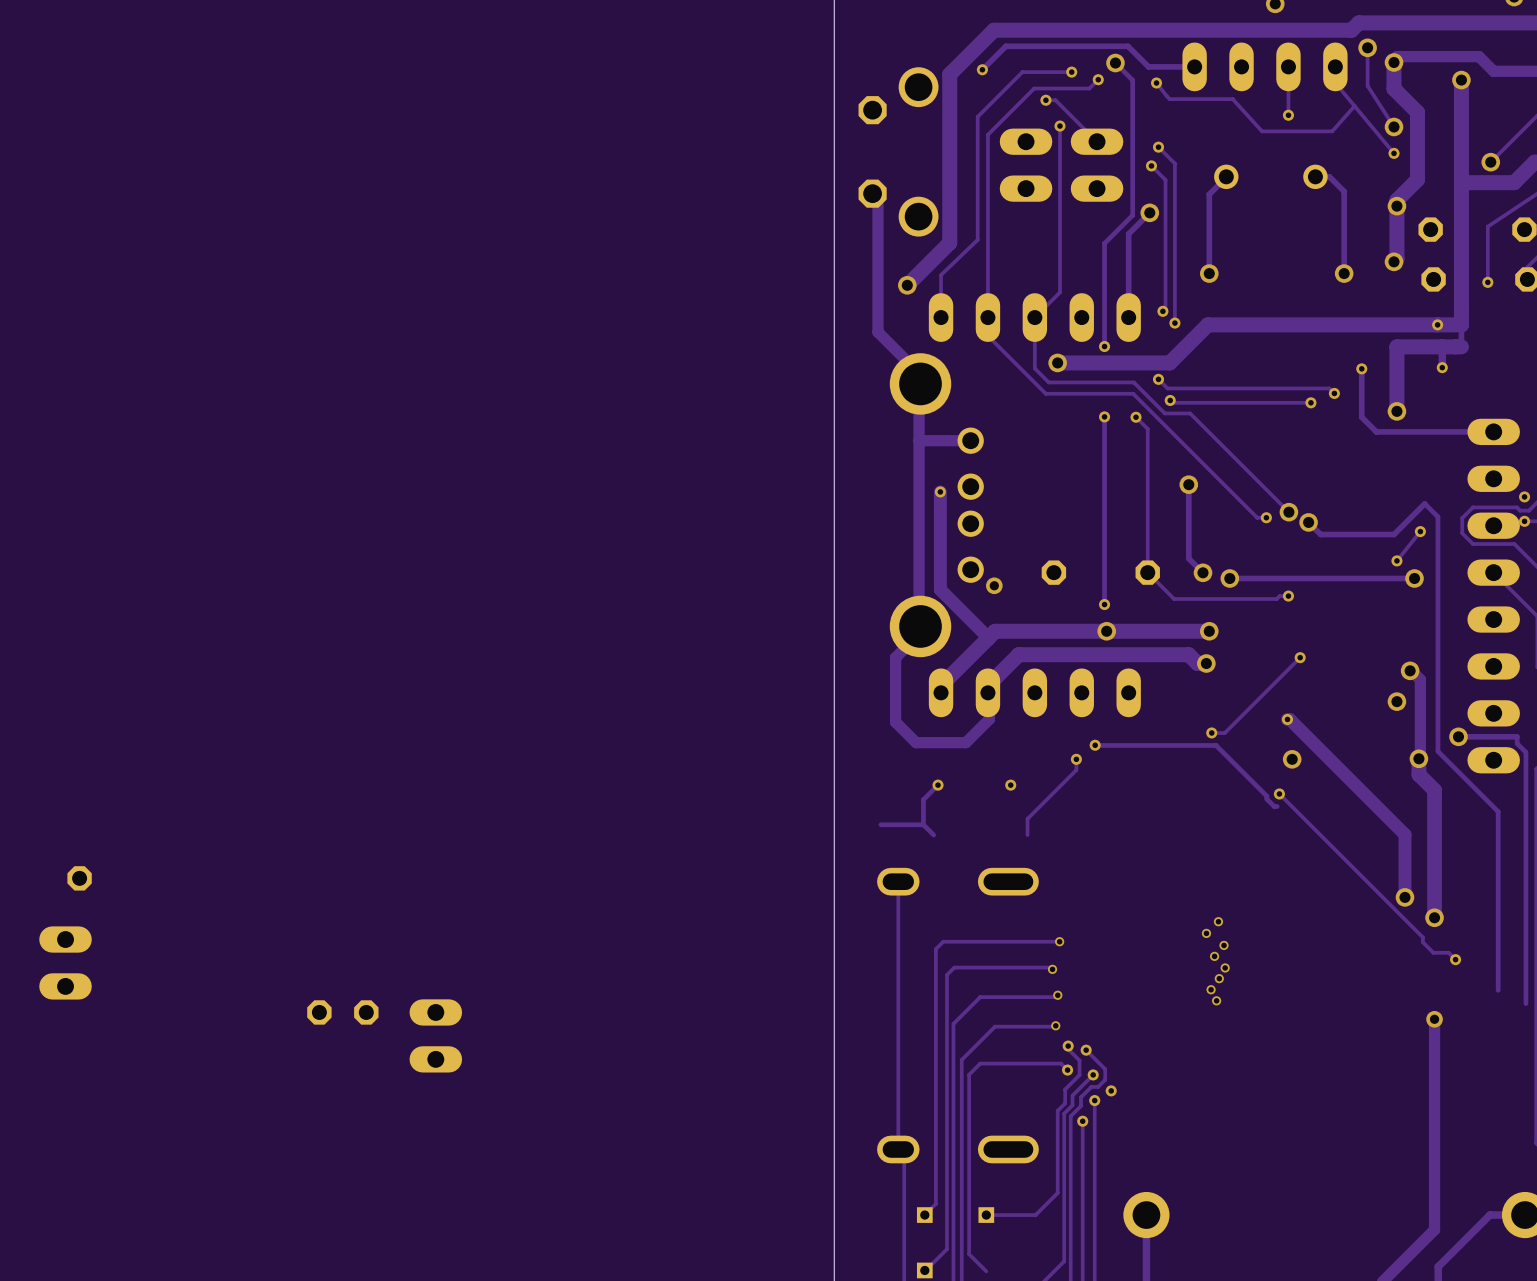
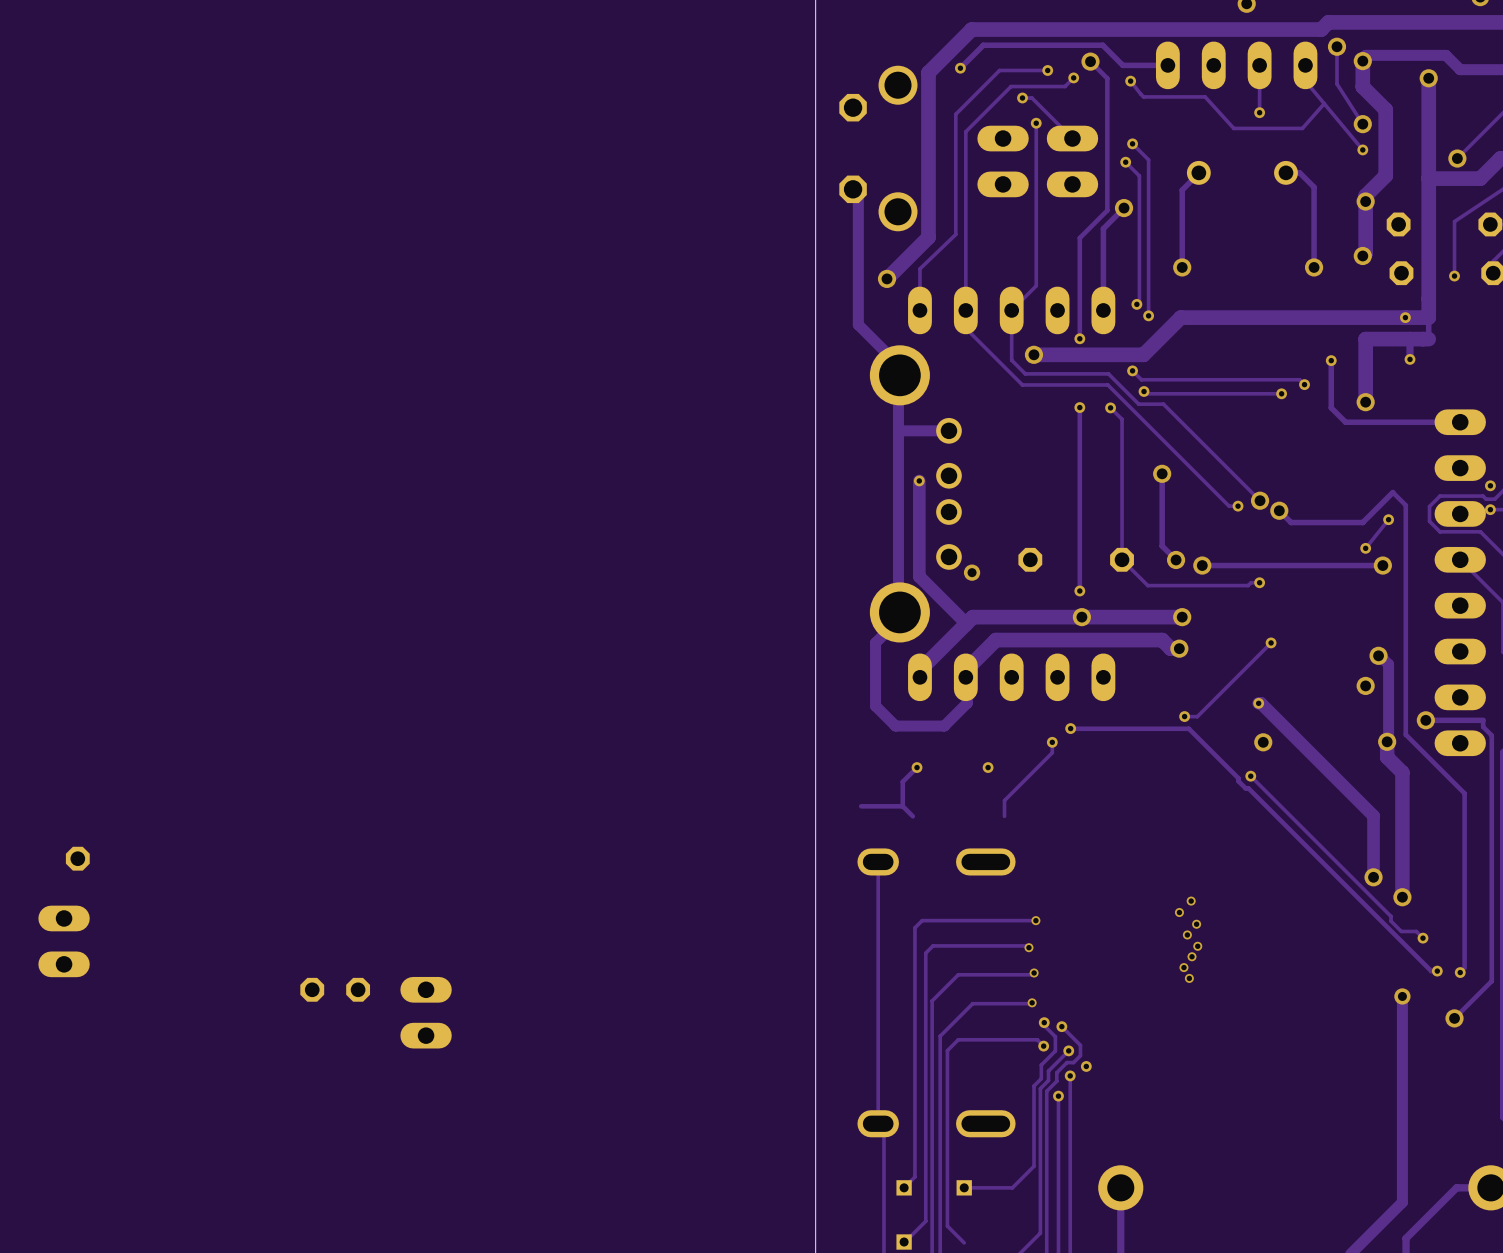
track: none -> (1248, 788) (1431, 971) (1437, 971)
via: none -> (1437, 971)
via: none -> (1460, 972)
track: none -> (1491, 981) (1454, 1018)
via: none -> (1454, 1018)

